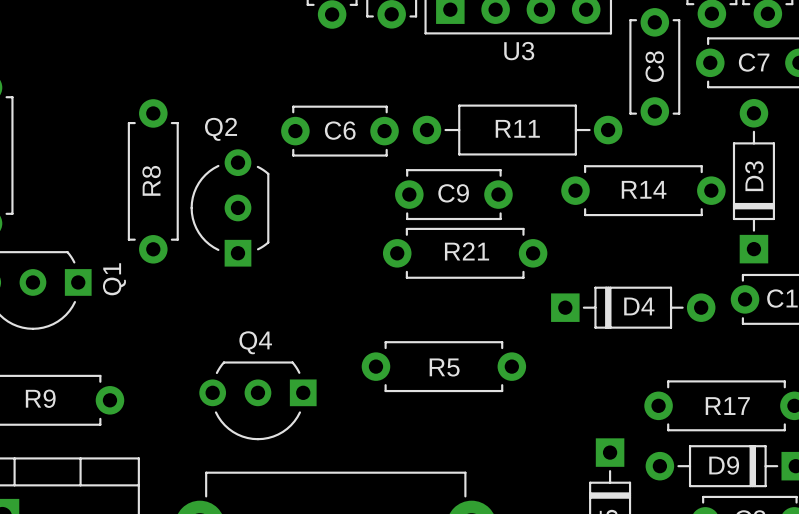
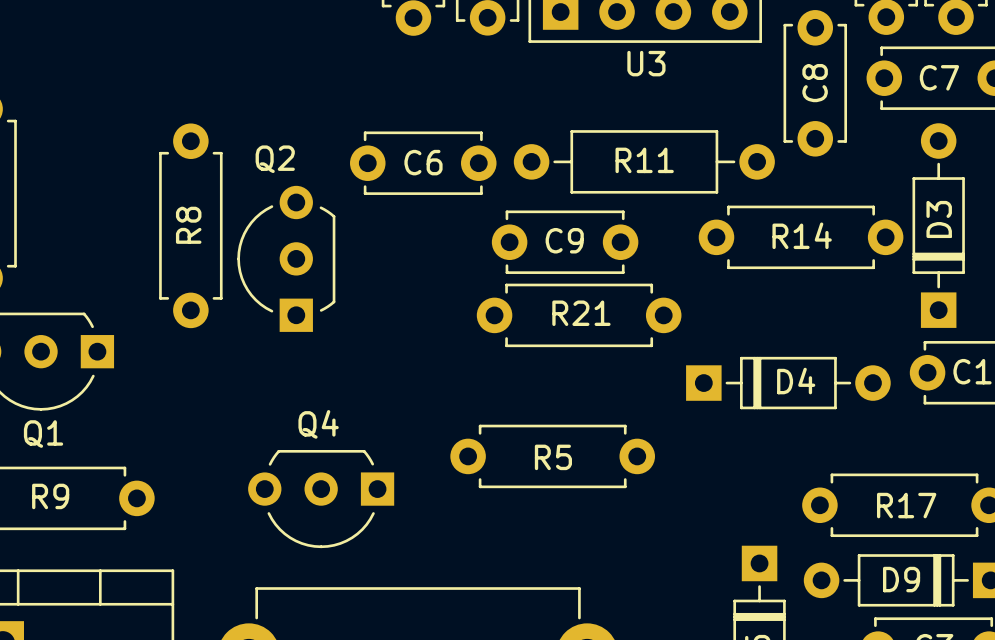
Q1 name rotation: 0° (114, 279) -> 90° clockwise (43, 434)
Q1 name position: Q1 (114, 279) -> Q1 (43, 434)

